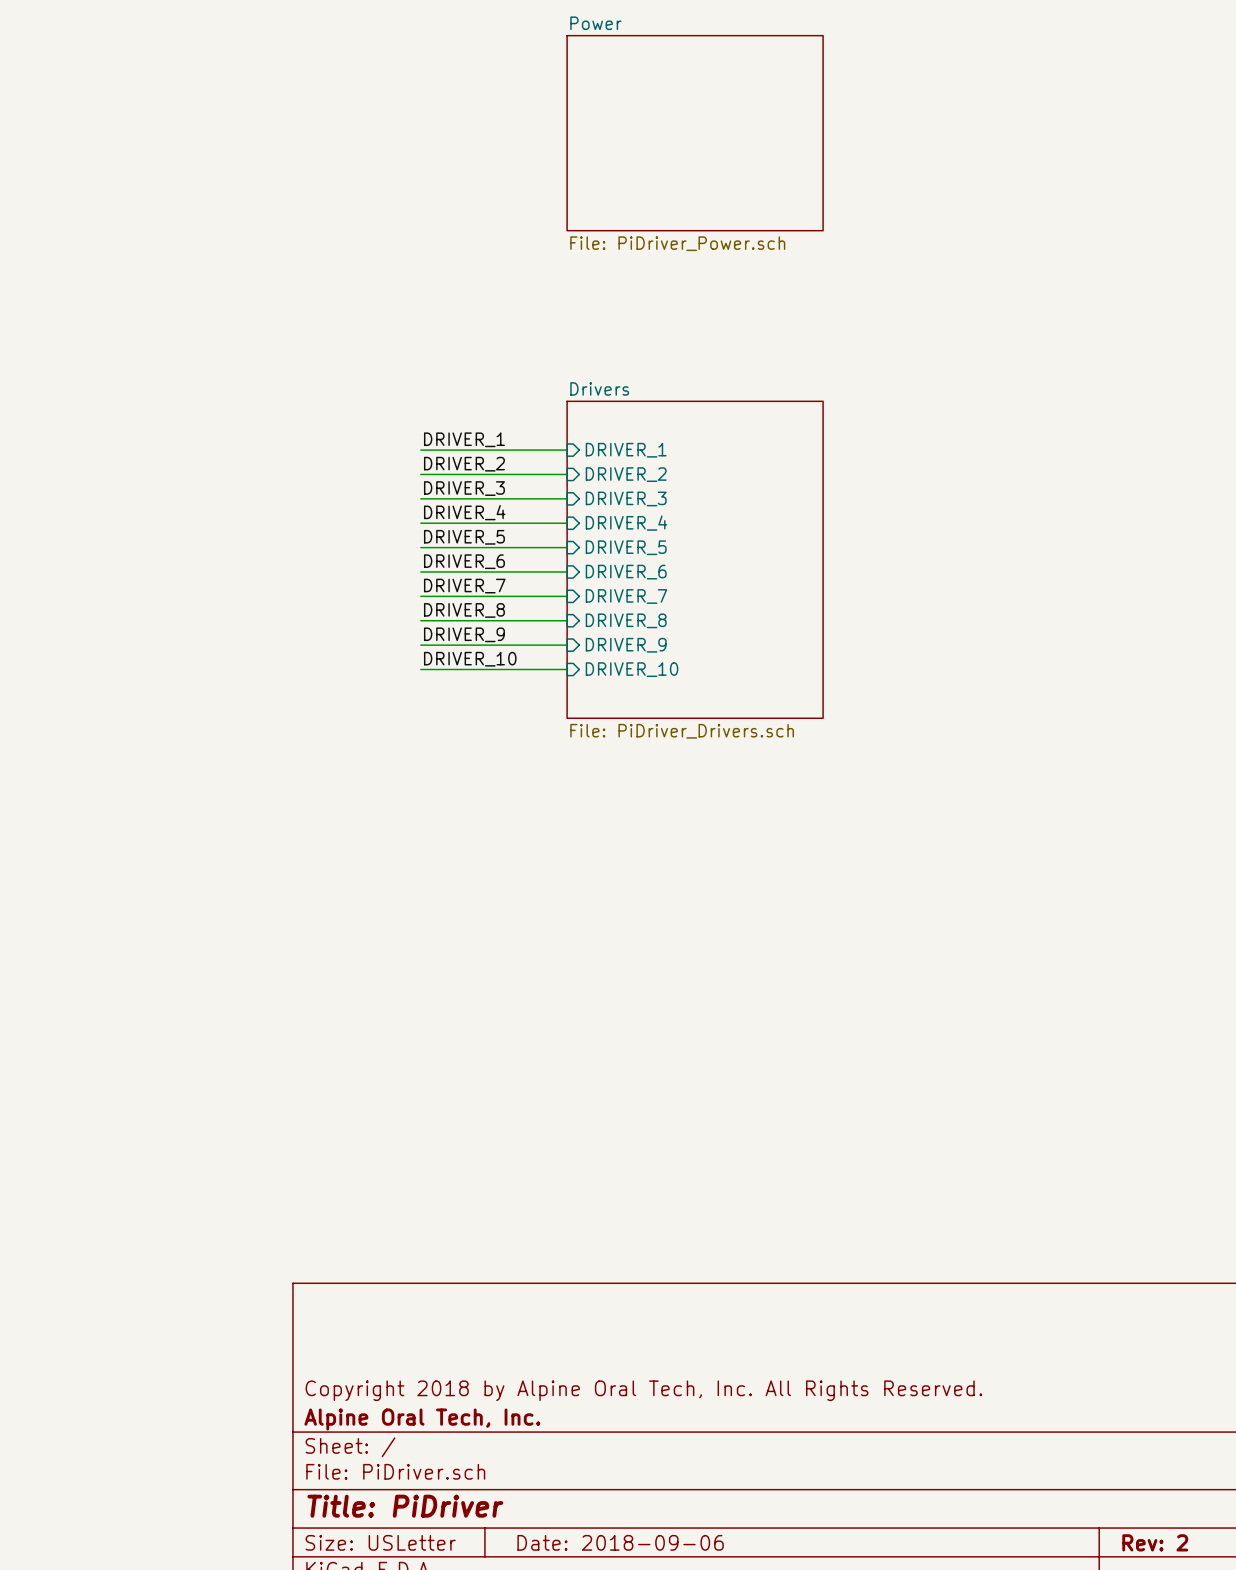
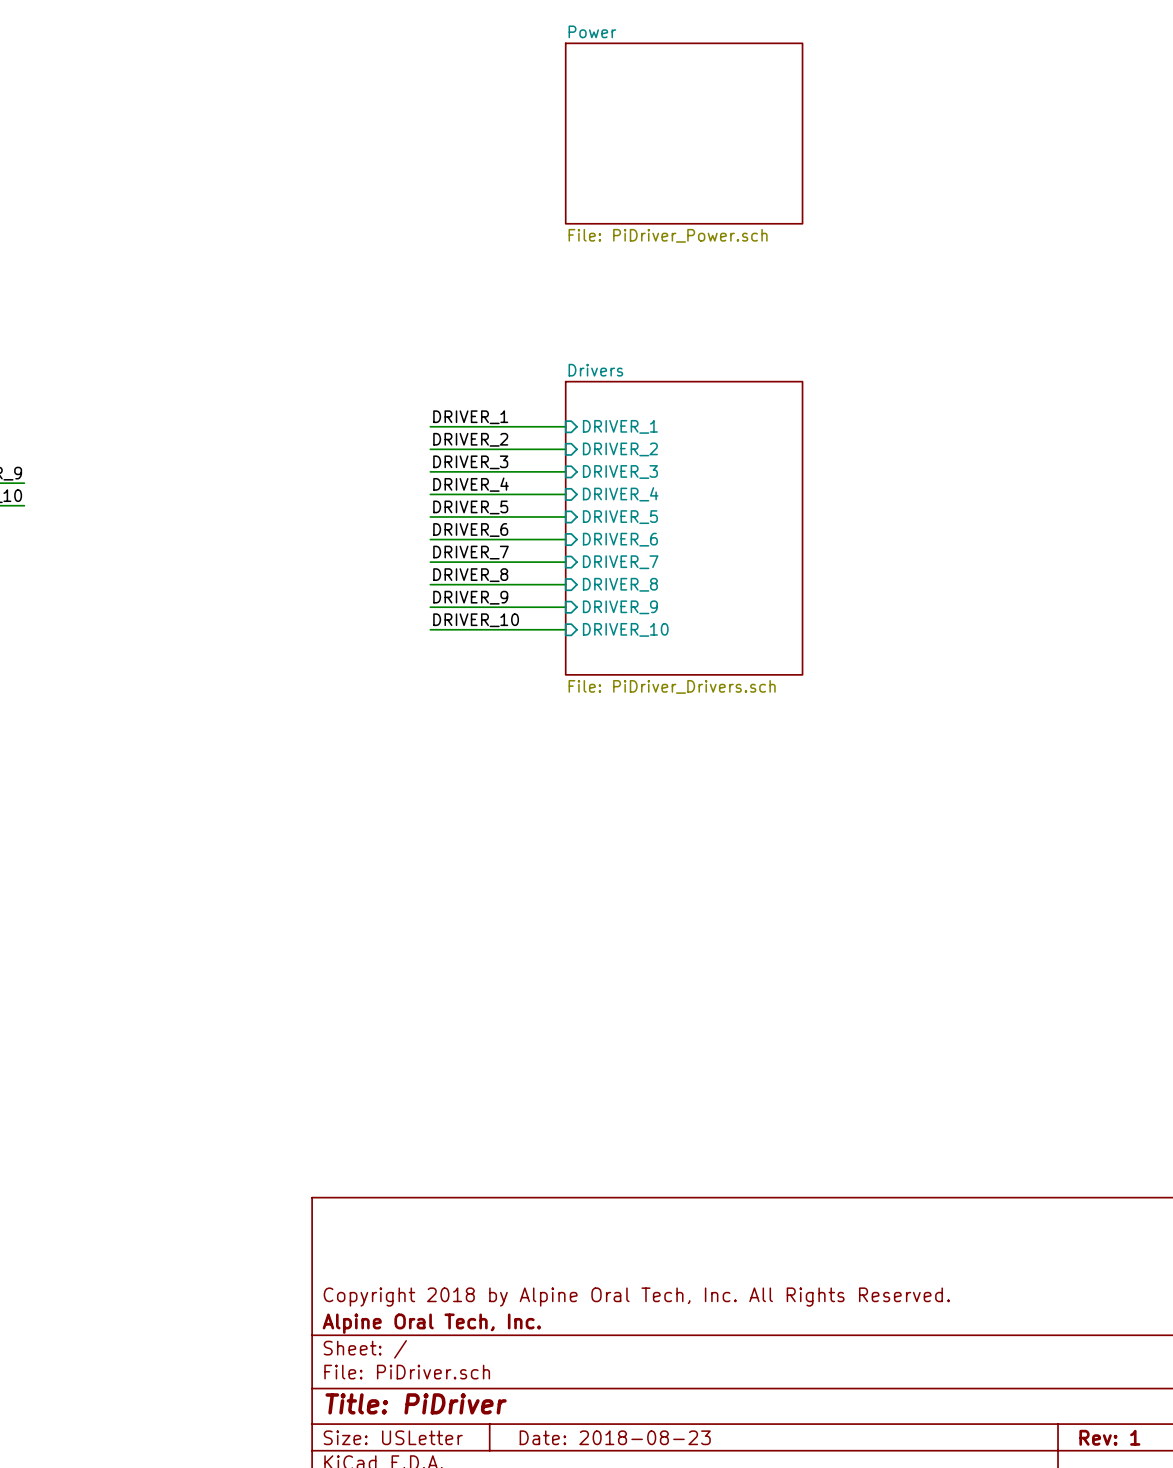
title block: Date: 2018-09-06 (620, 1542) -> Date: 2018-08-23 (615, 1437)
title block: Rev: 2 (1155, 1542) -> Rev: 1 (1109, 1437)

